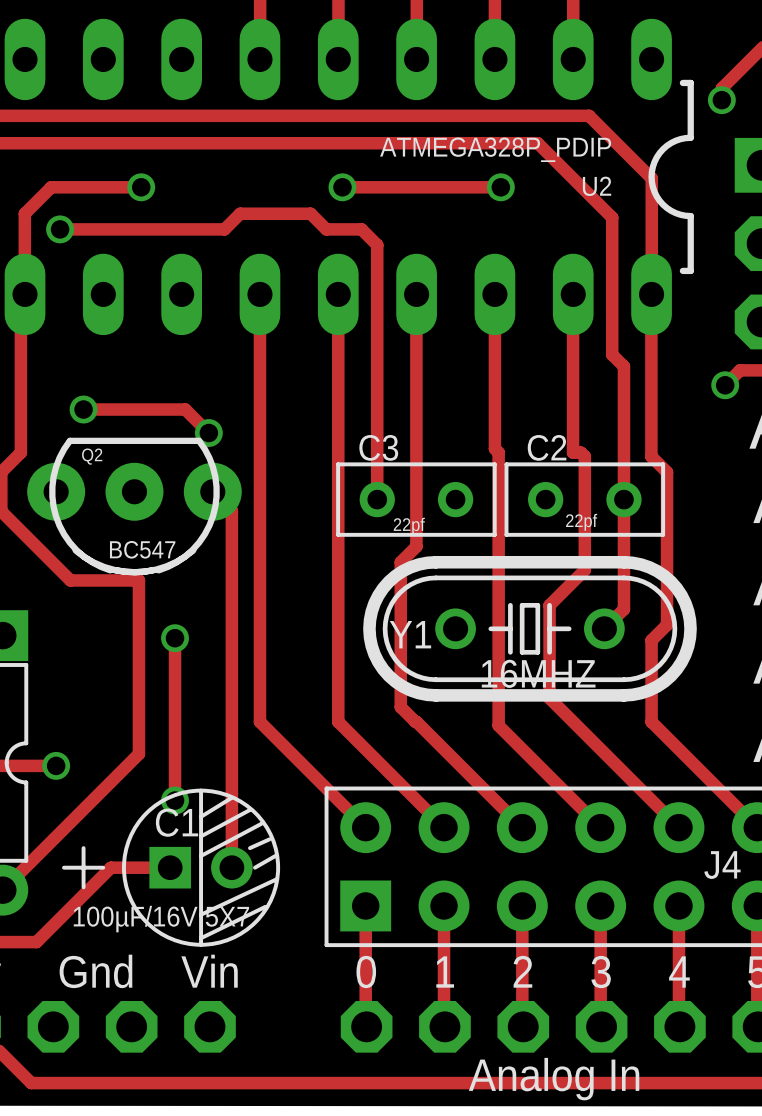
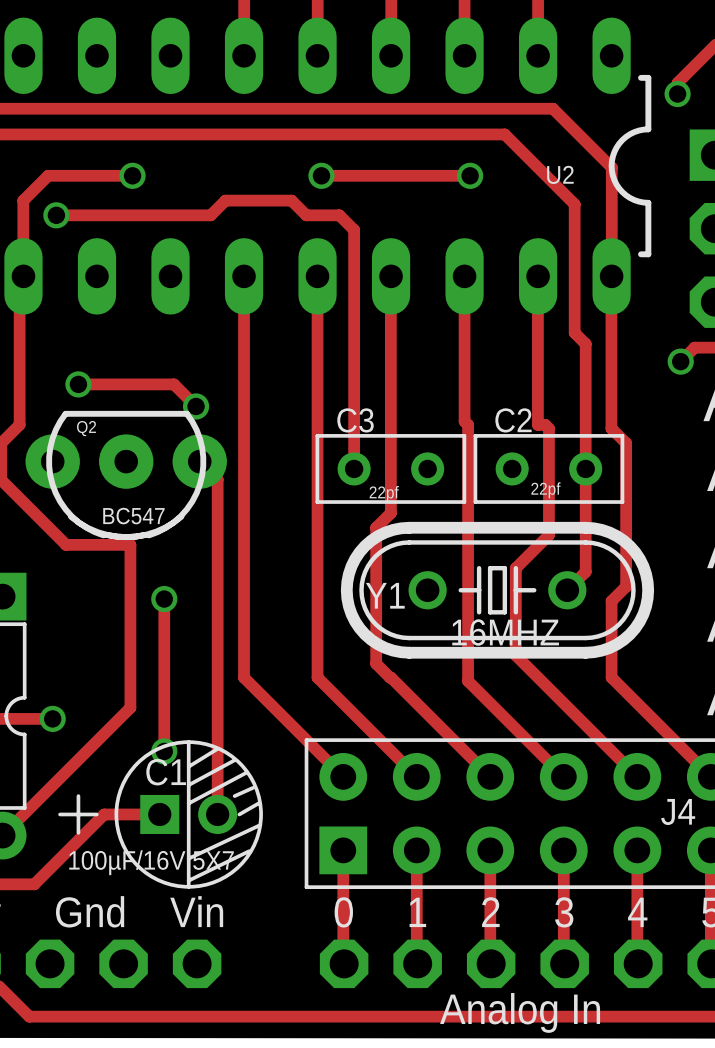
U2 value: ATMEGA328P_PDIP (495, 149) -> none

